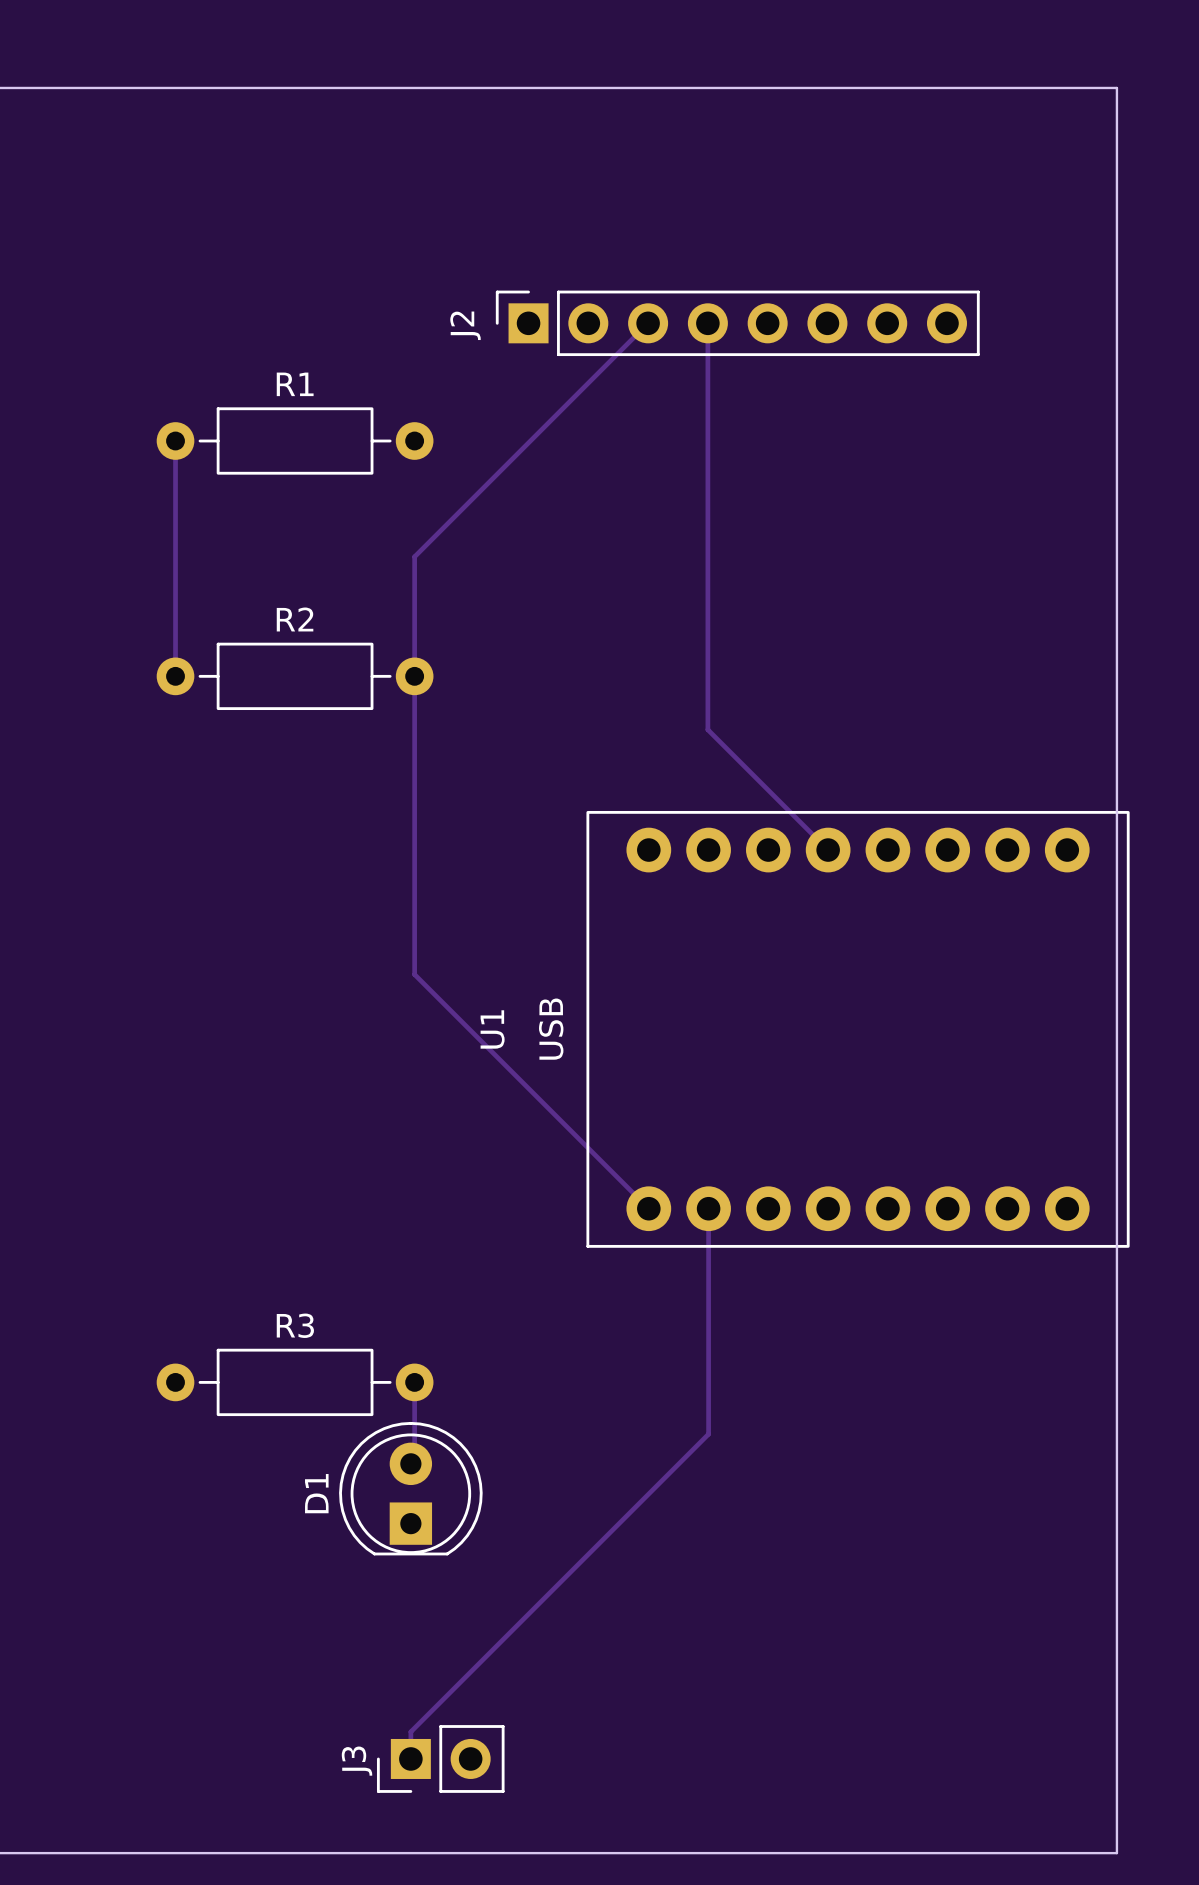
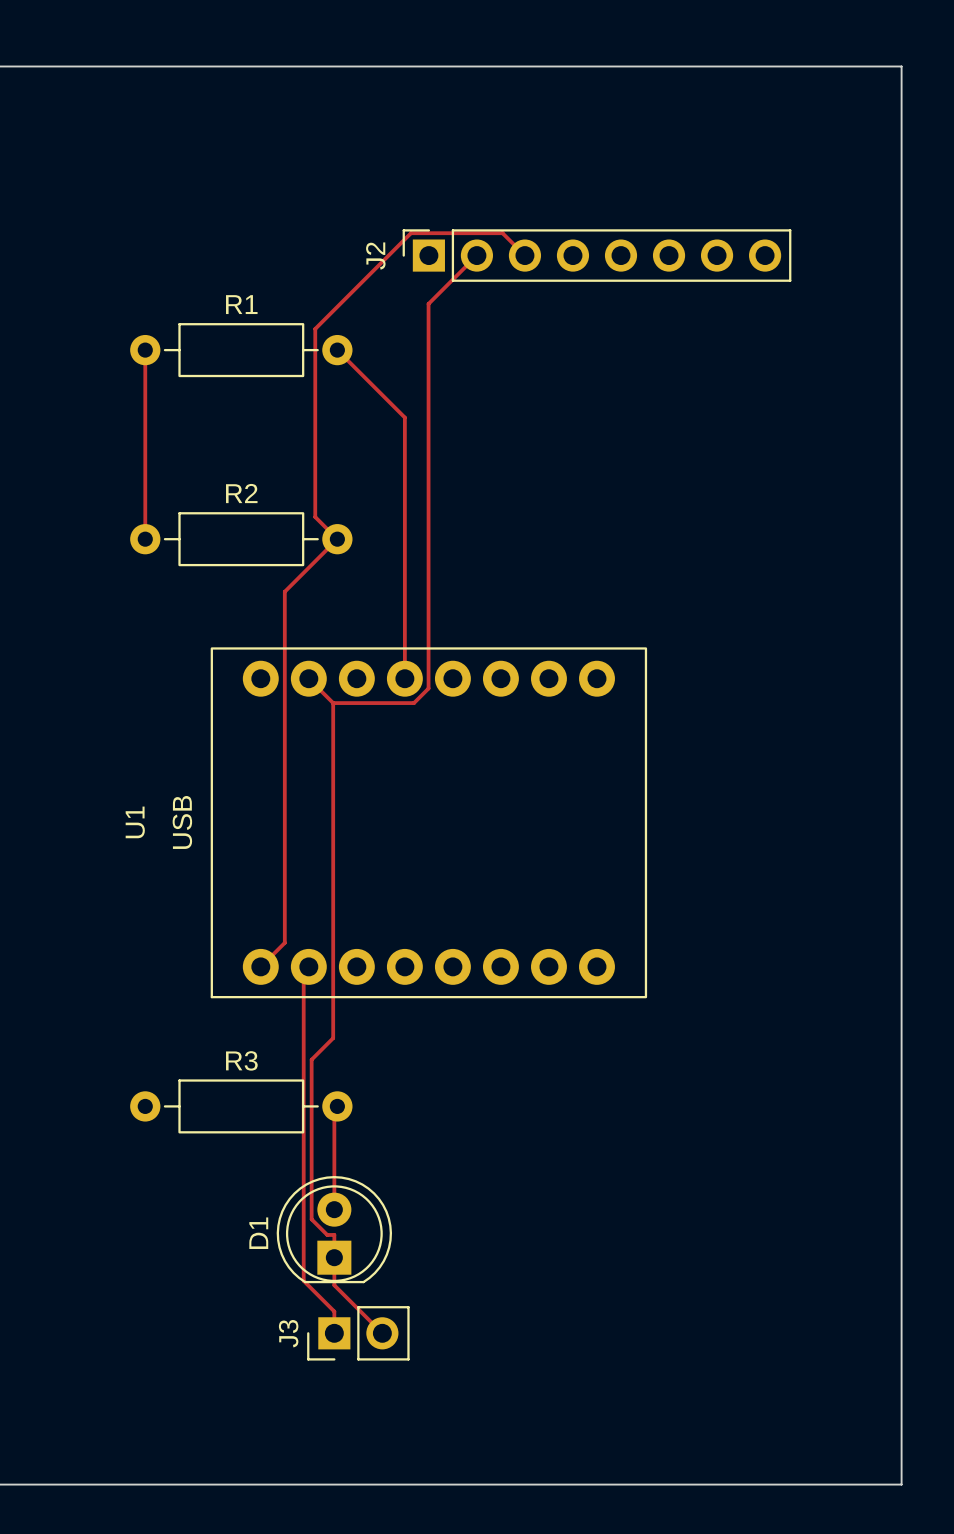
track: none -> (476, 255) (428, 303) (428, 688) (414, 703) (333, 703)
track: (648, 323) (414, 556) (414, 974) (648, 1208) -> (524, 255) (502, 233) (411, 233) (315, 328) (315, 517) (337, 539) (284, 591) (284, 942) (260, 966)
track: (707, 323) (707, 729) (828, 850) -> none
track: none -> (337, 350) (404, 417) (404, 678)
track: none -> (308, 678) (333, 703)
track: none -> (333, 703) (333, 1038) (311, 1059) (311, 1219) (327, 1234) (334, 1234) (334, 1285) (382, 1333)
U1 position: (858, 1029) -> (428, 822)
track: none -> (308, 966) (303, 972) (303, 1280) (334, 1311) (334, 1333)
track: (708, 1208) (708, 1434) (410, 1731) (410, 1758) -> none
track: (414, 1382) (414, 1460) (410, 1463) -> (337, 1106) (334, 1109) (334, 1209)
D1 position: (410, 1488) -> (334, 1229)
J3 position: (440, 1758) -> (358, 1333)

